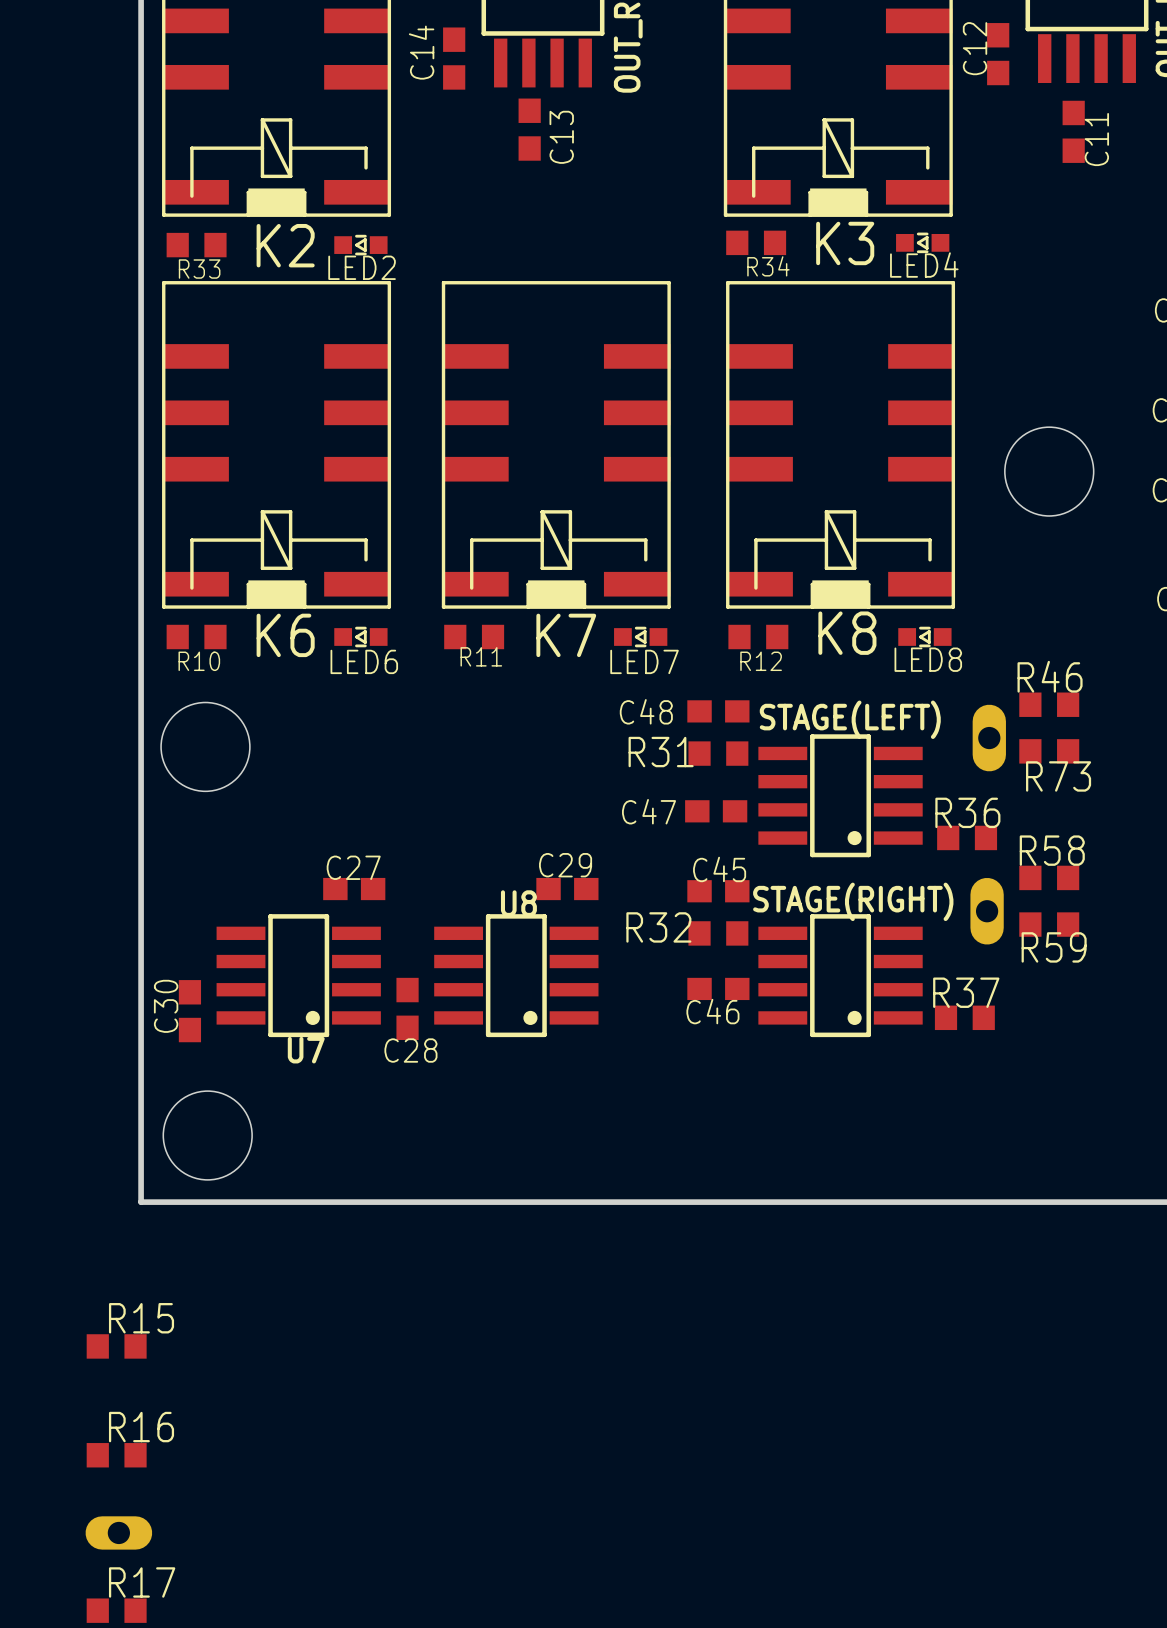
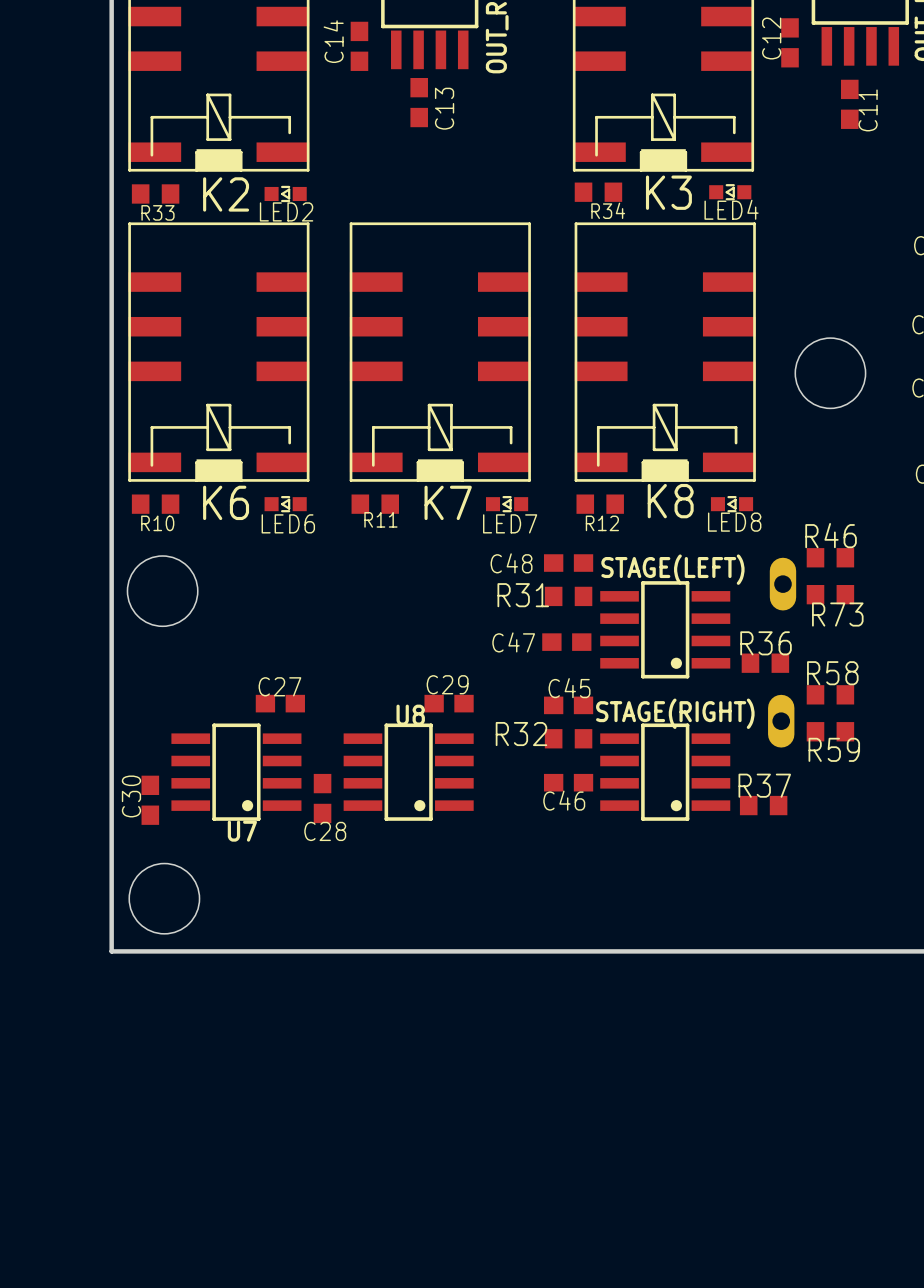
R15: (116, 1346) -> none
R16: (116, 1455) -> none
part: (118, 1532) -> none
R17: (116, 1610) -> none

